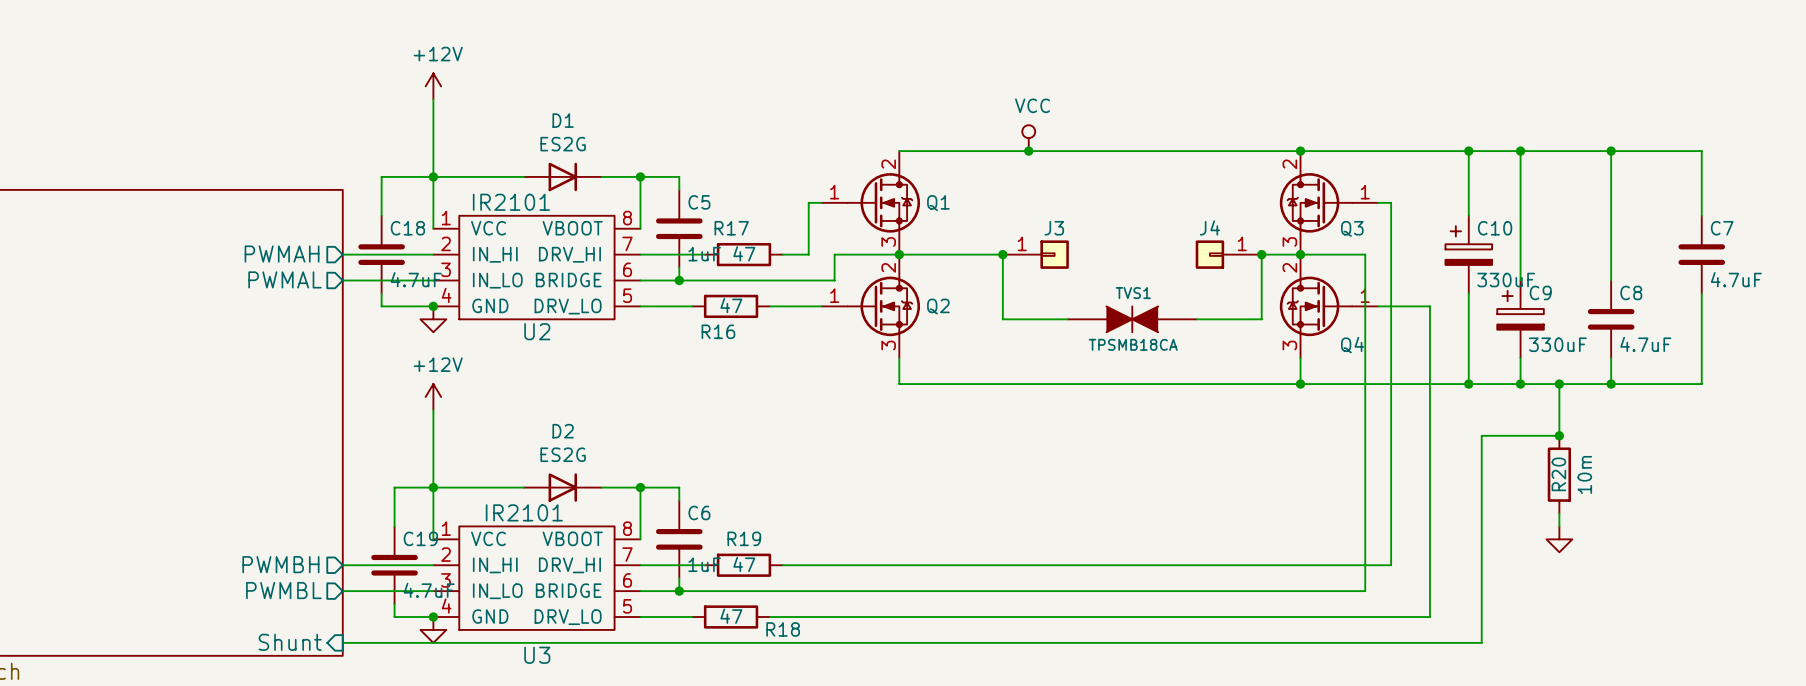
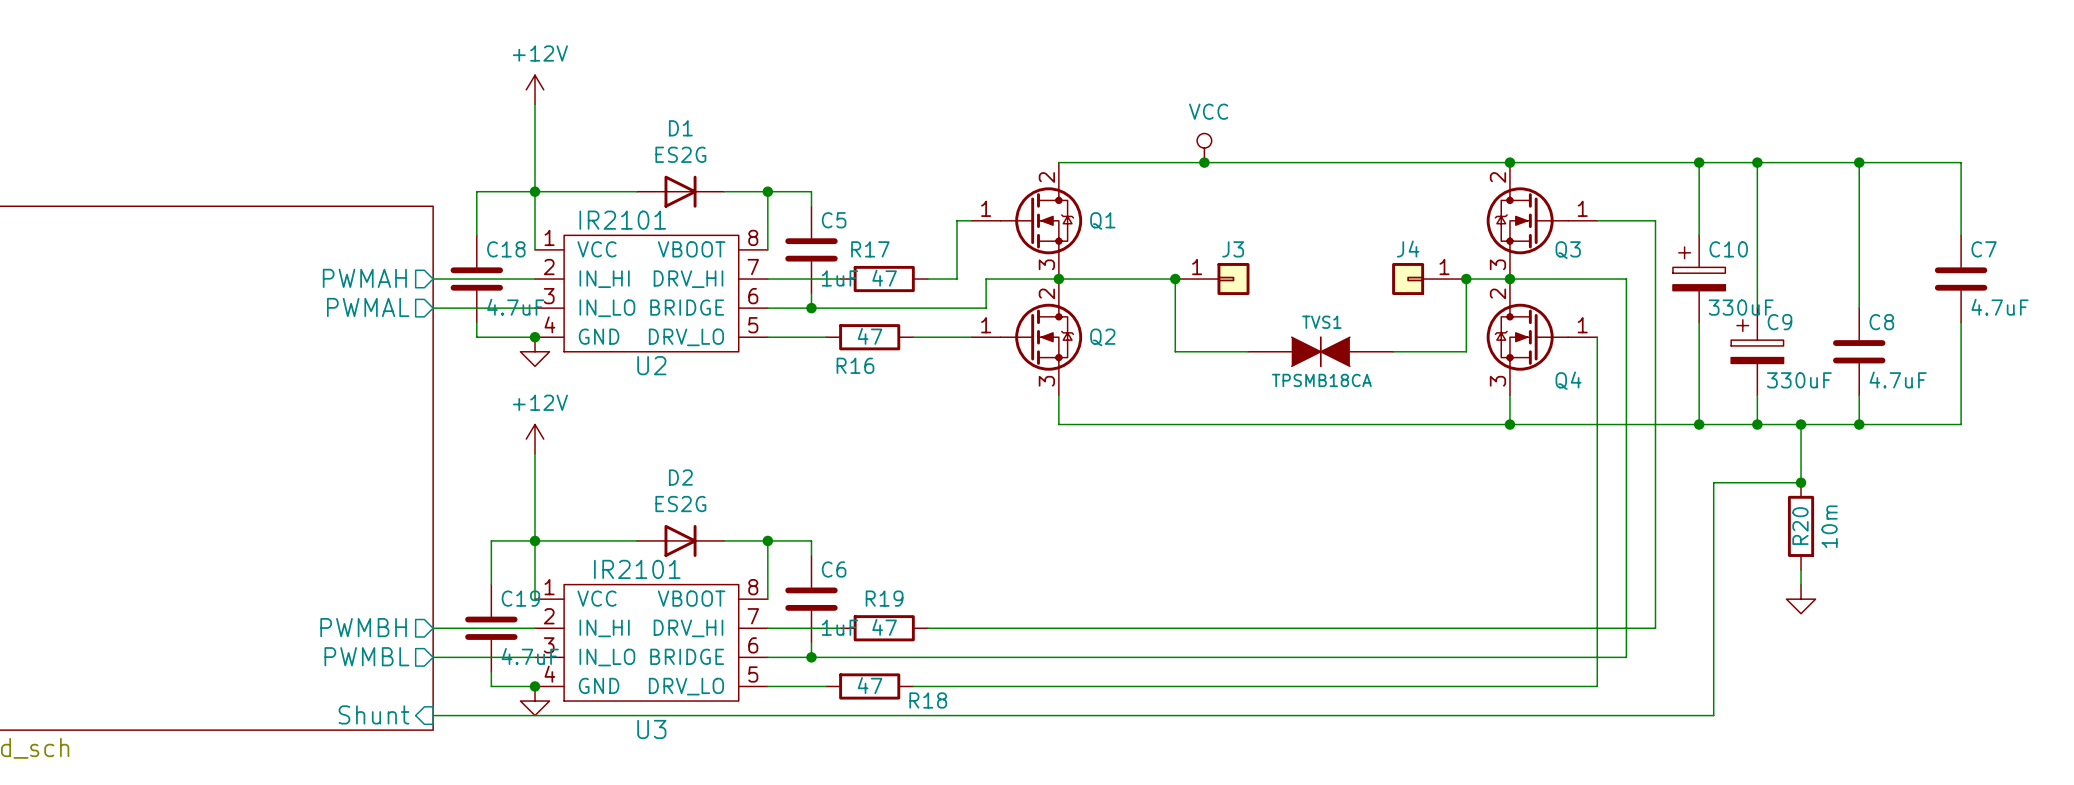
wire: (1391, 202) (1391, 565) -> none
wire: (1365, 254) (1365, 591) -> (1582, 279) (1626, 279) (1626, 657) (1582, 657)
wire: (1378, 306) (1429, 306) -> (1611, 220) (1655, 220) (1655, 337)
wire: none -> (1597, 337) (1597, 686)
wire: (1429, 565) (1429, 617) (1378, 617) -> (1655, 628) (1611, 628)

